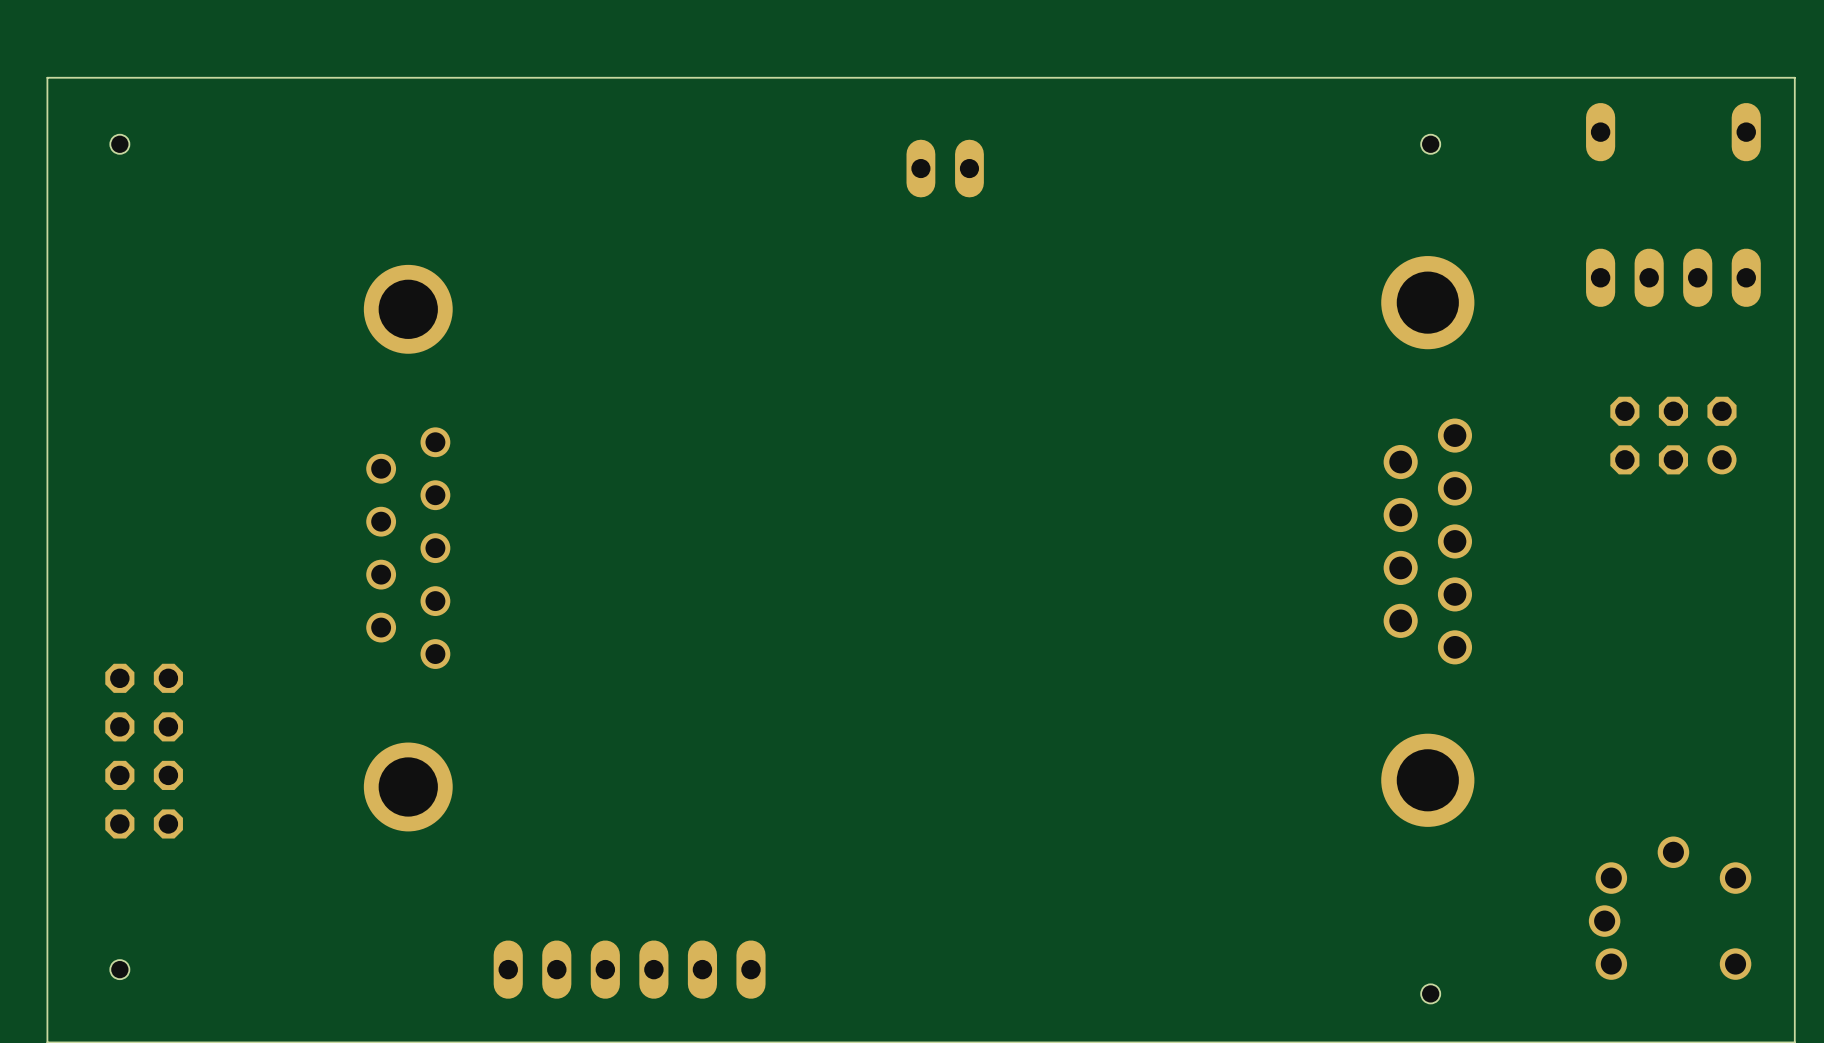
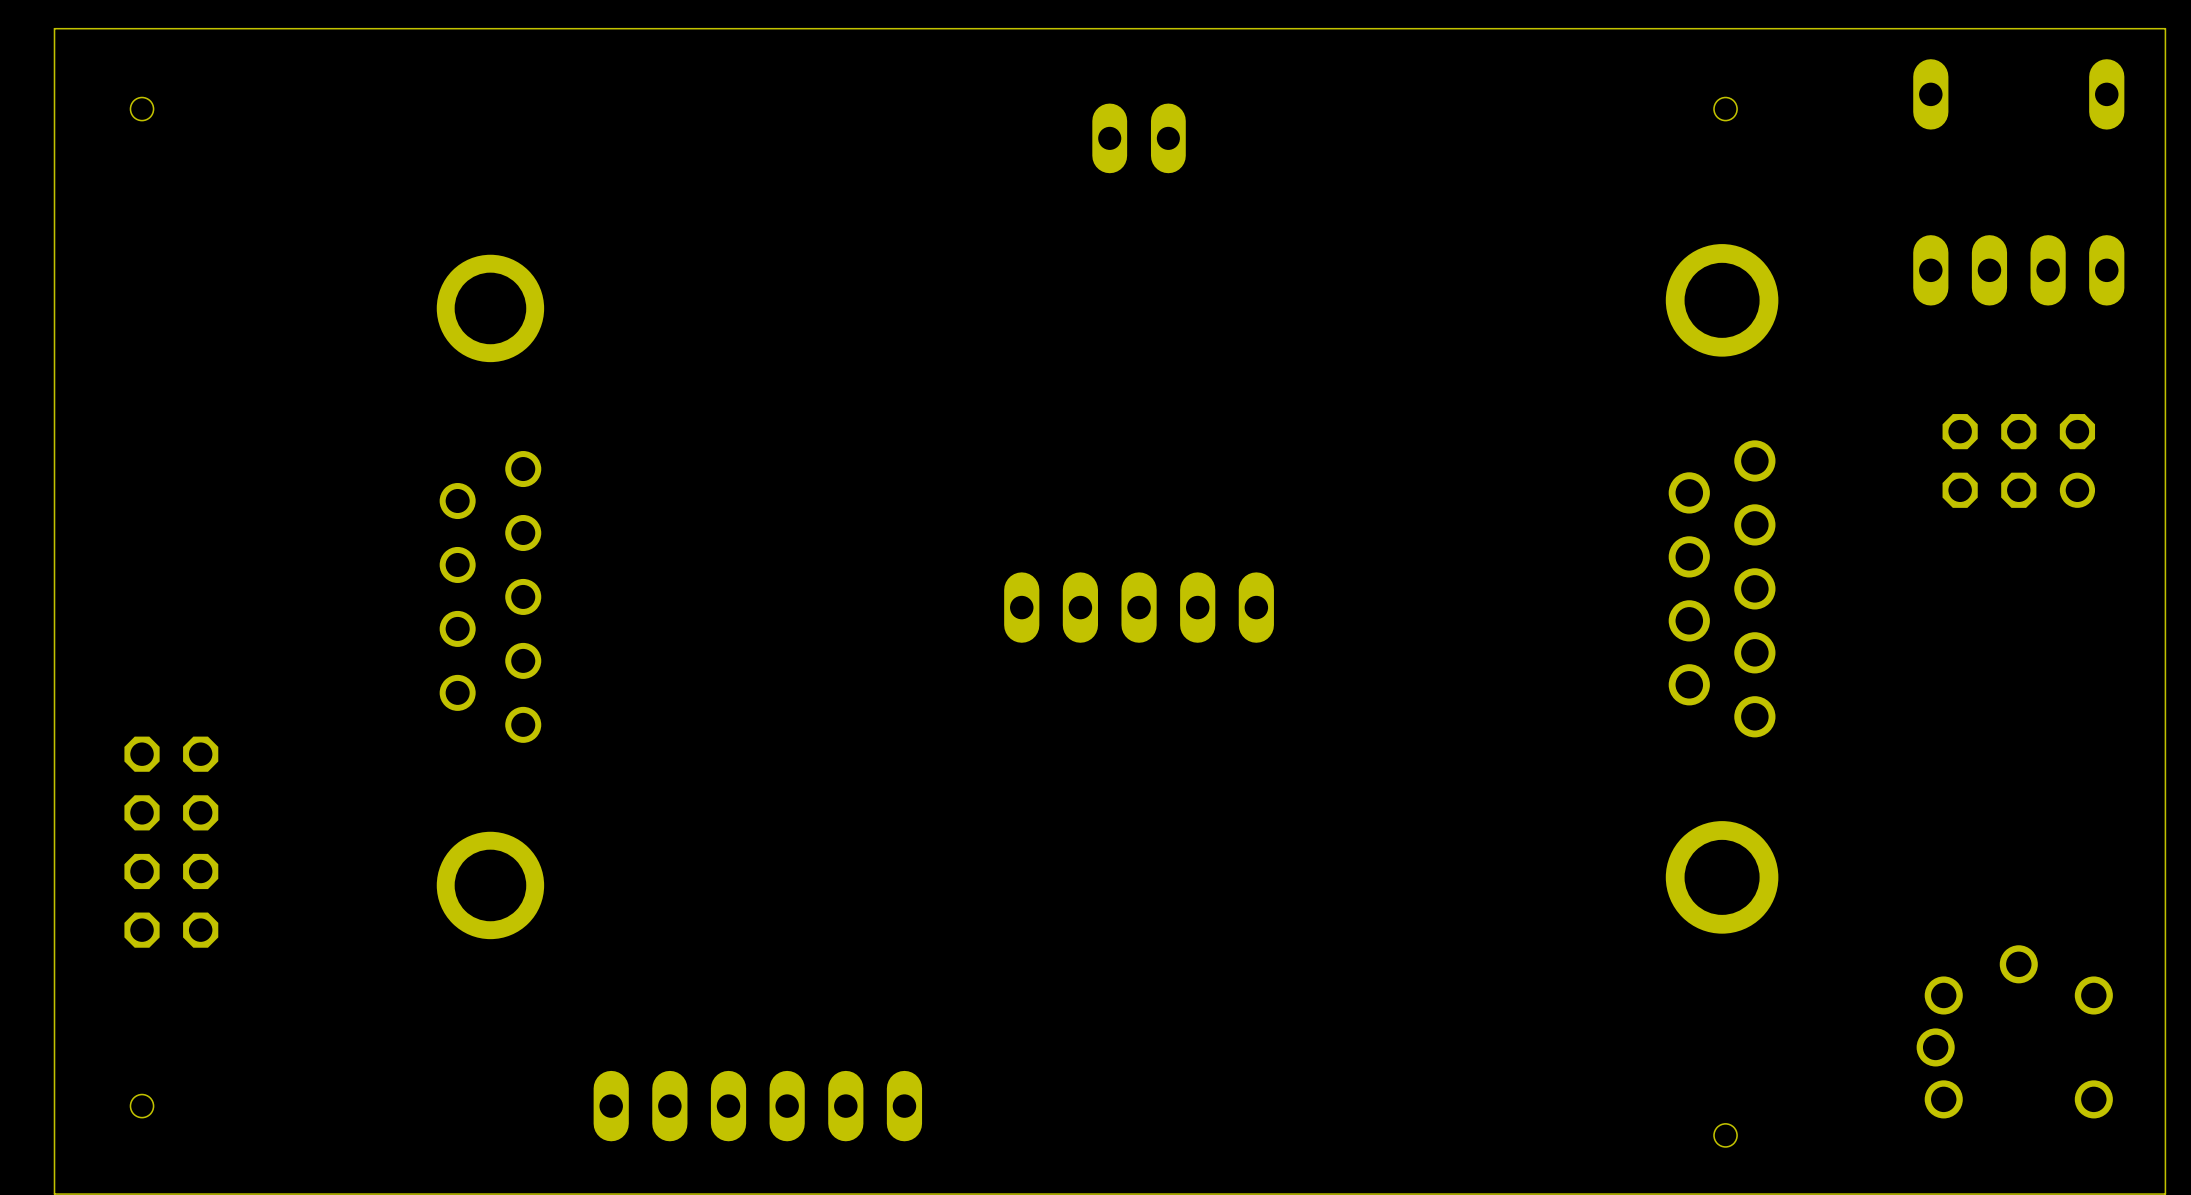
part: none -> (1139, 607)

